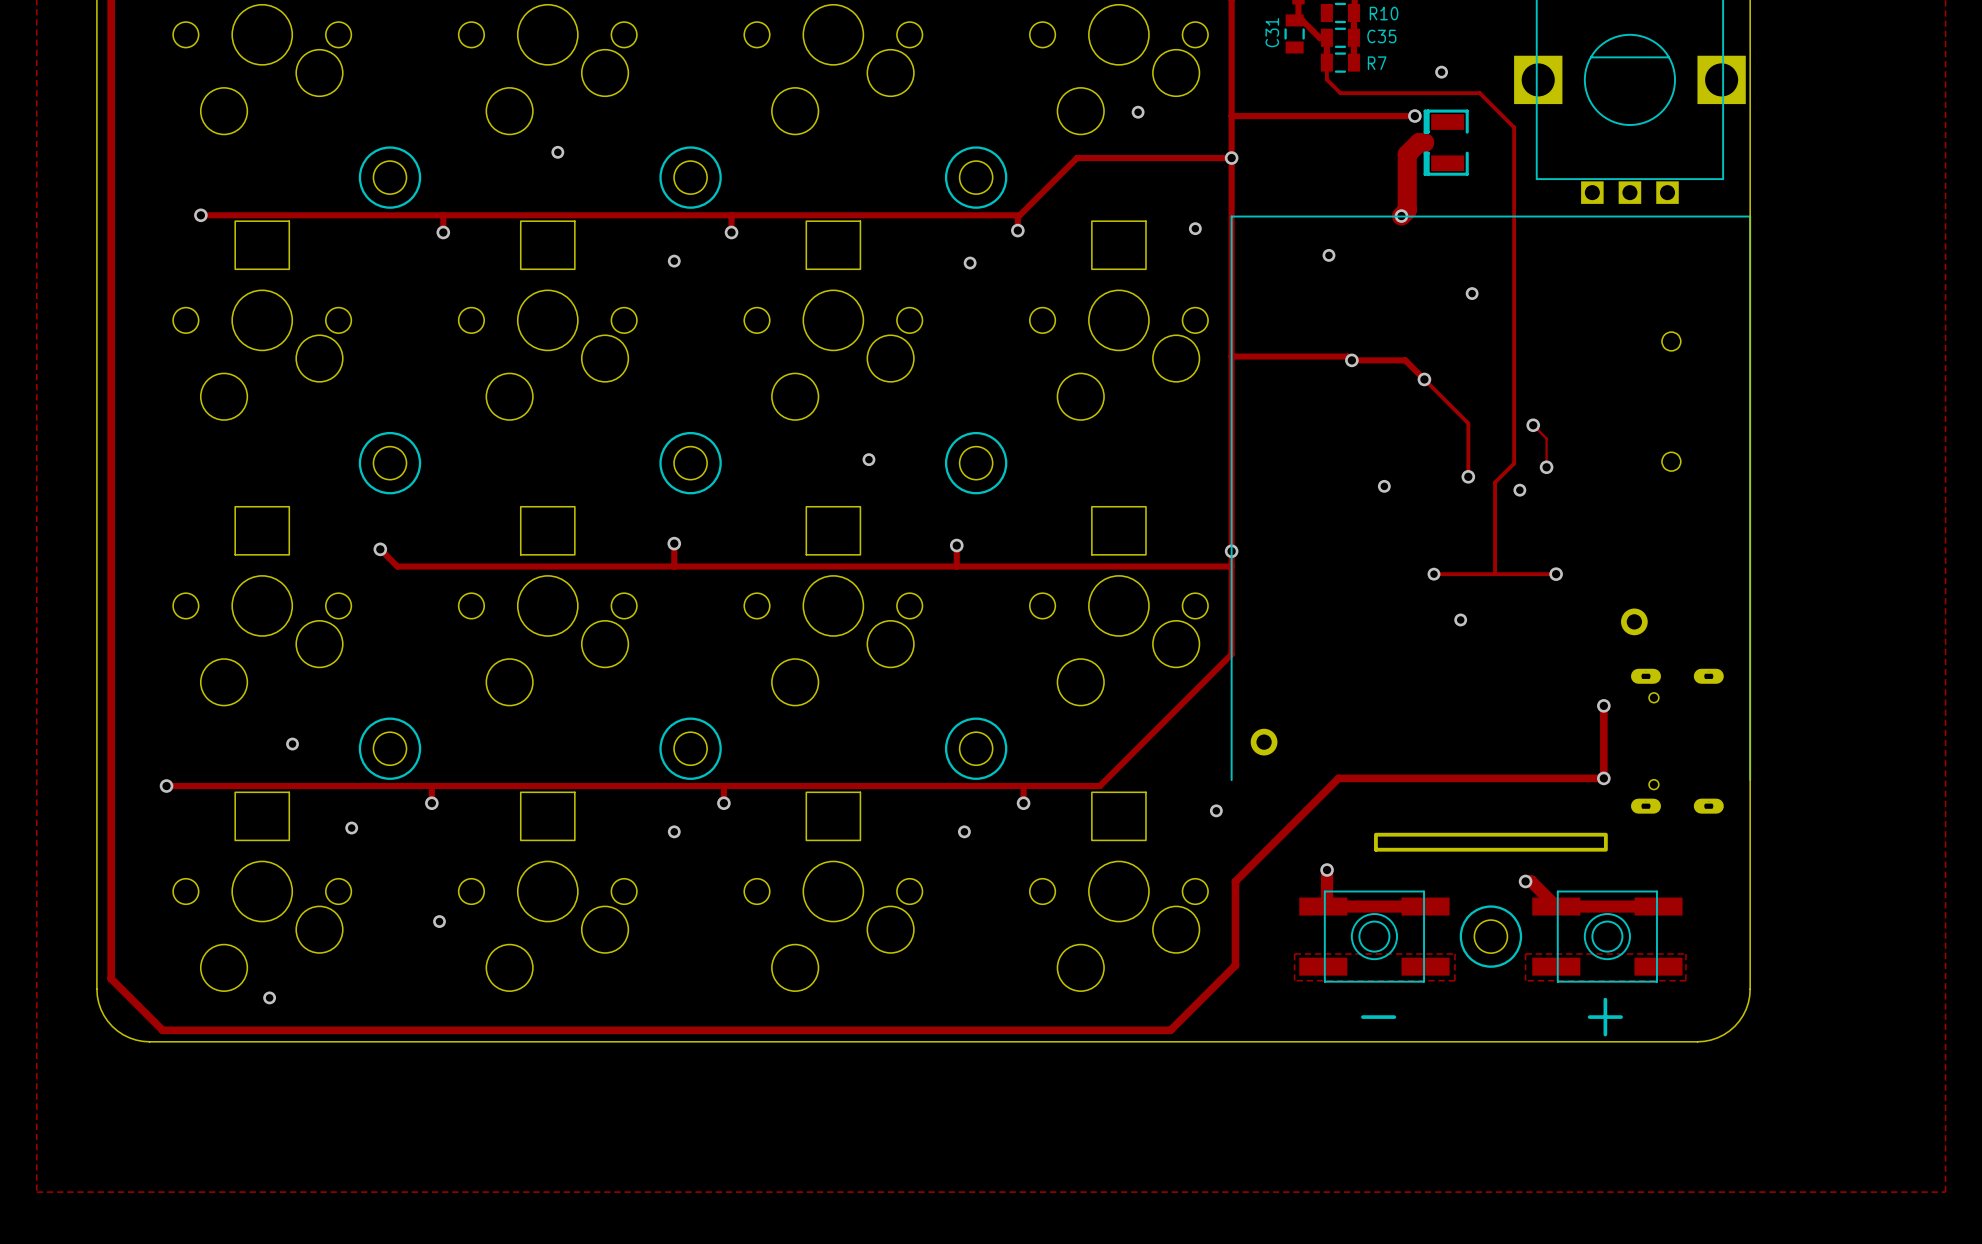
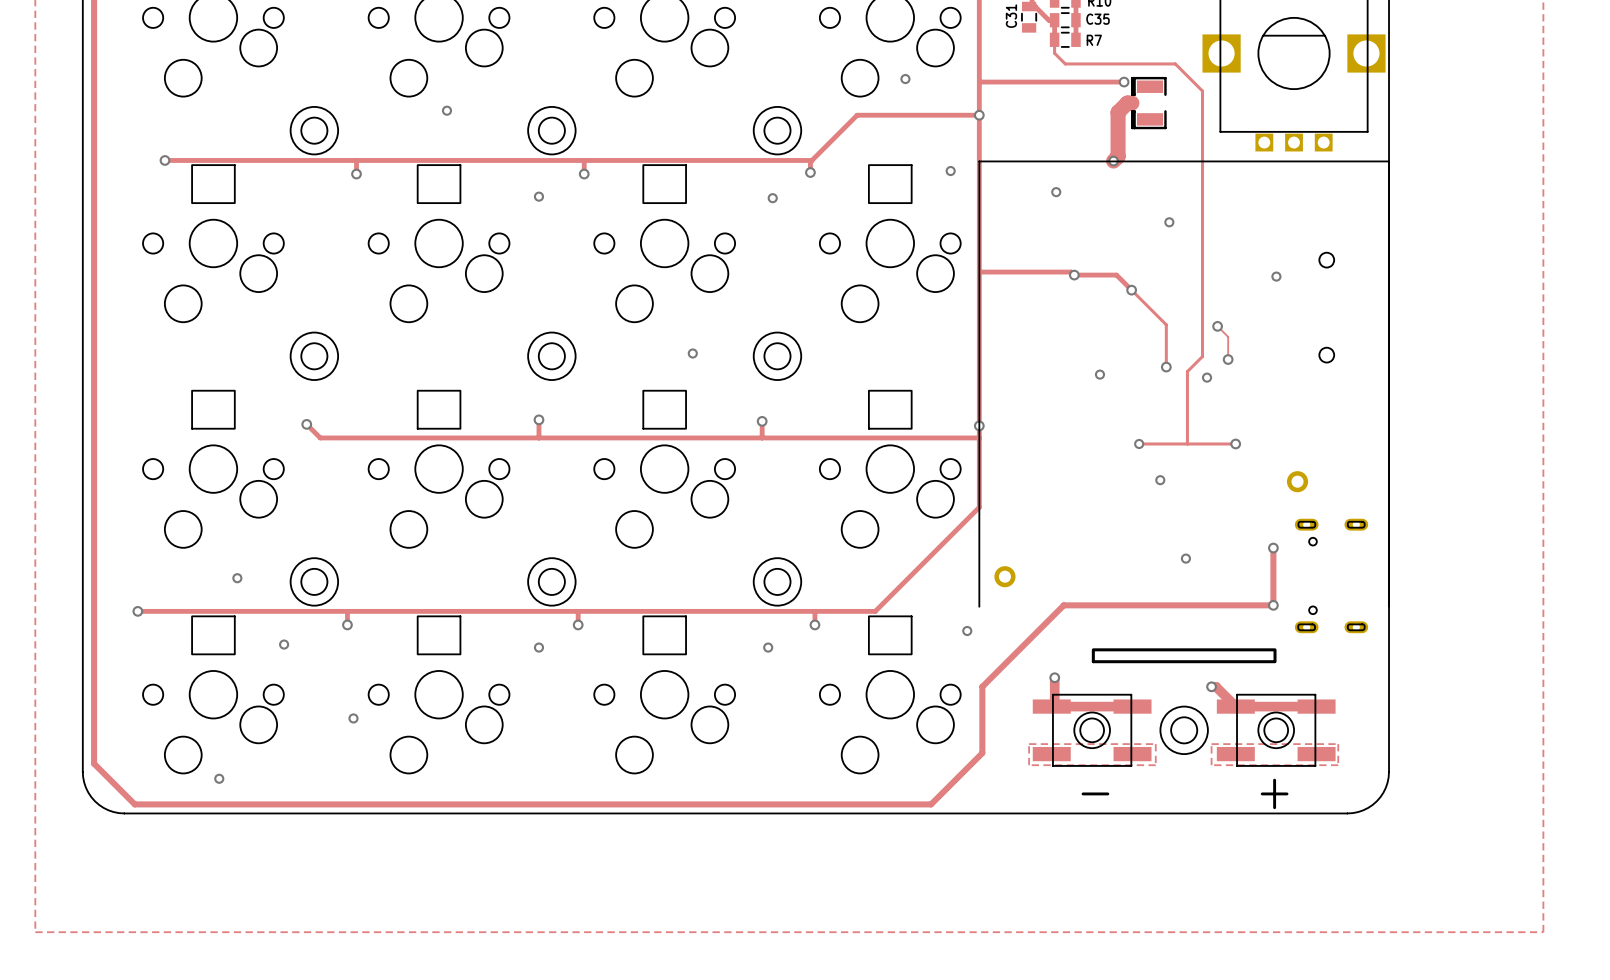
via: (1441, 72) -> none
via: none -> (1276, 276)
via: none -> (1185, 558)

